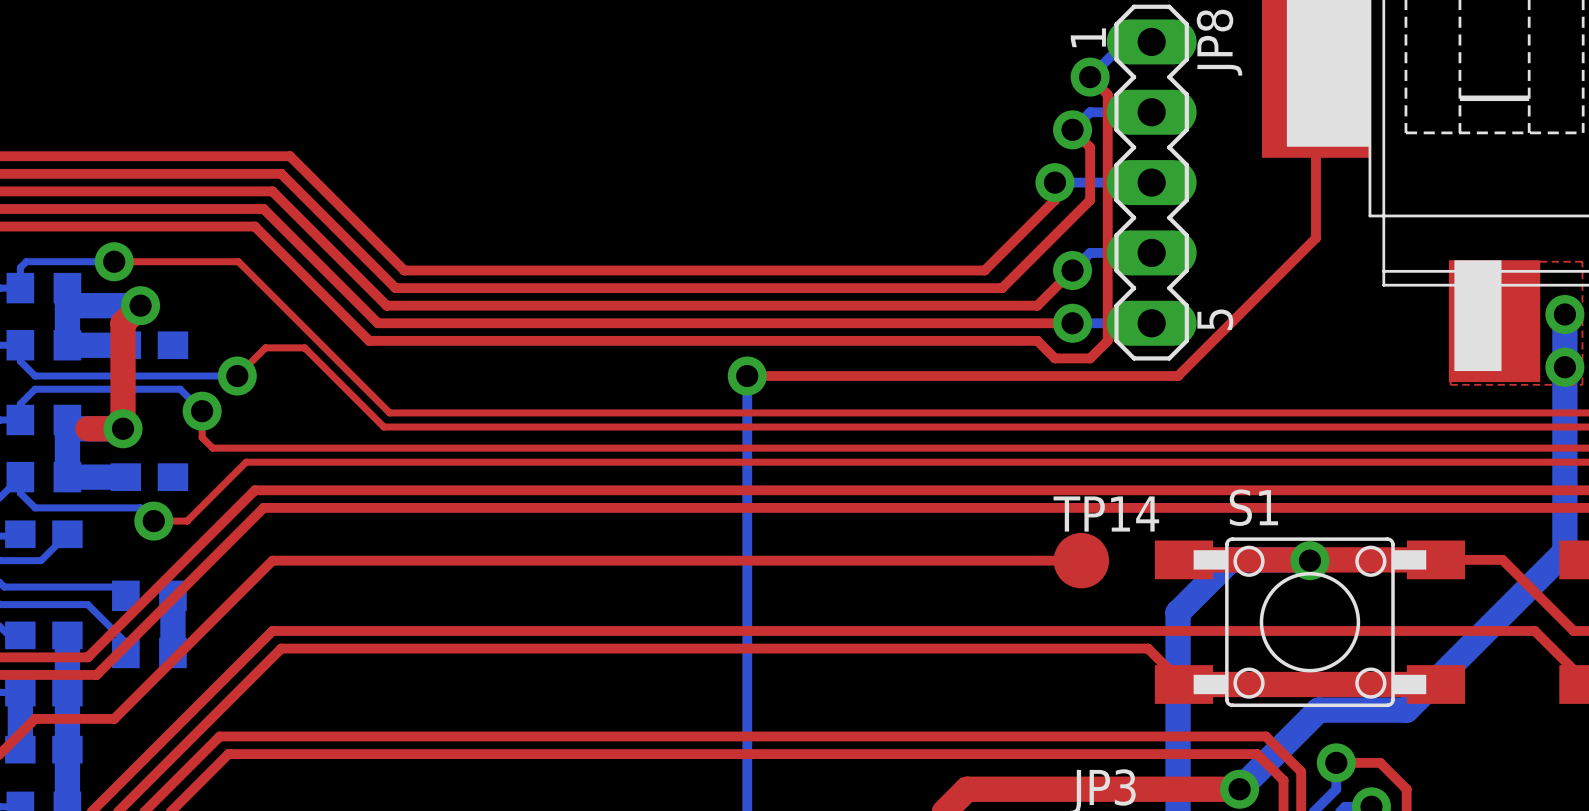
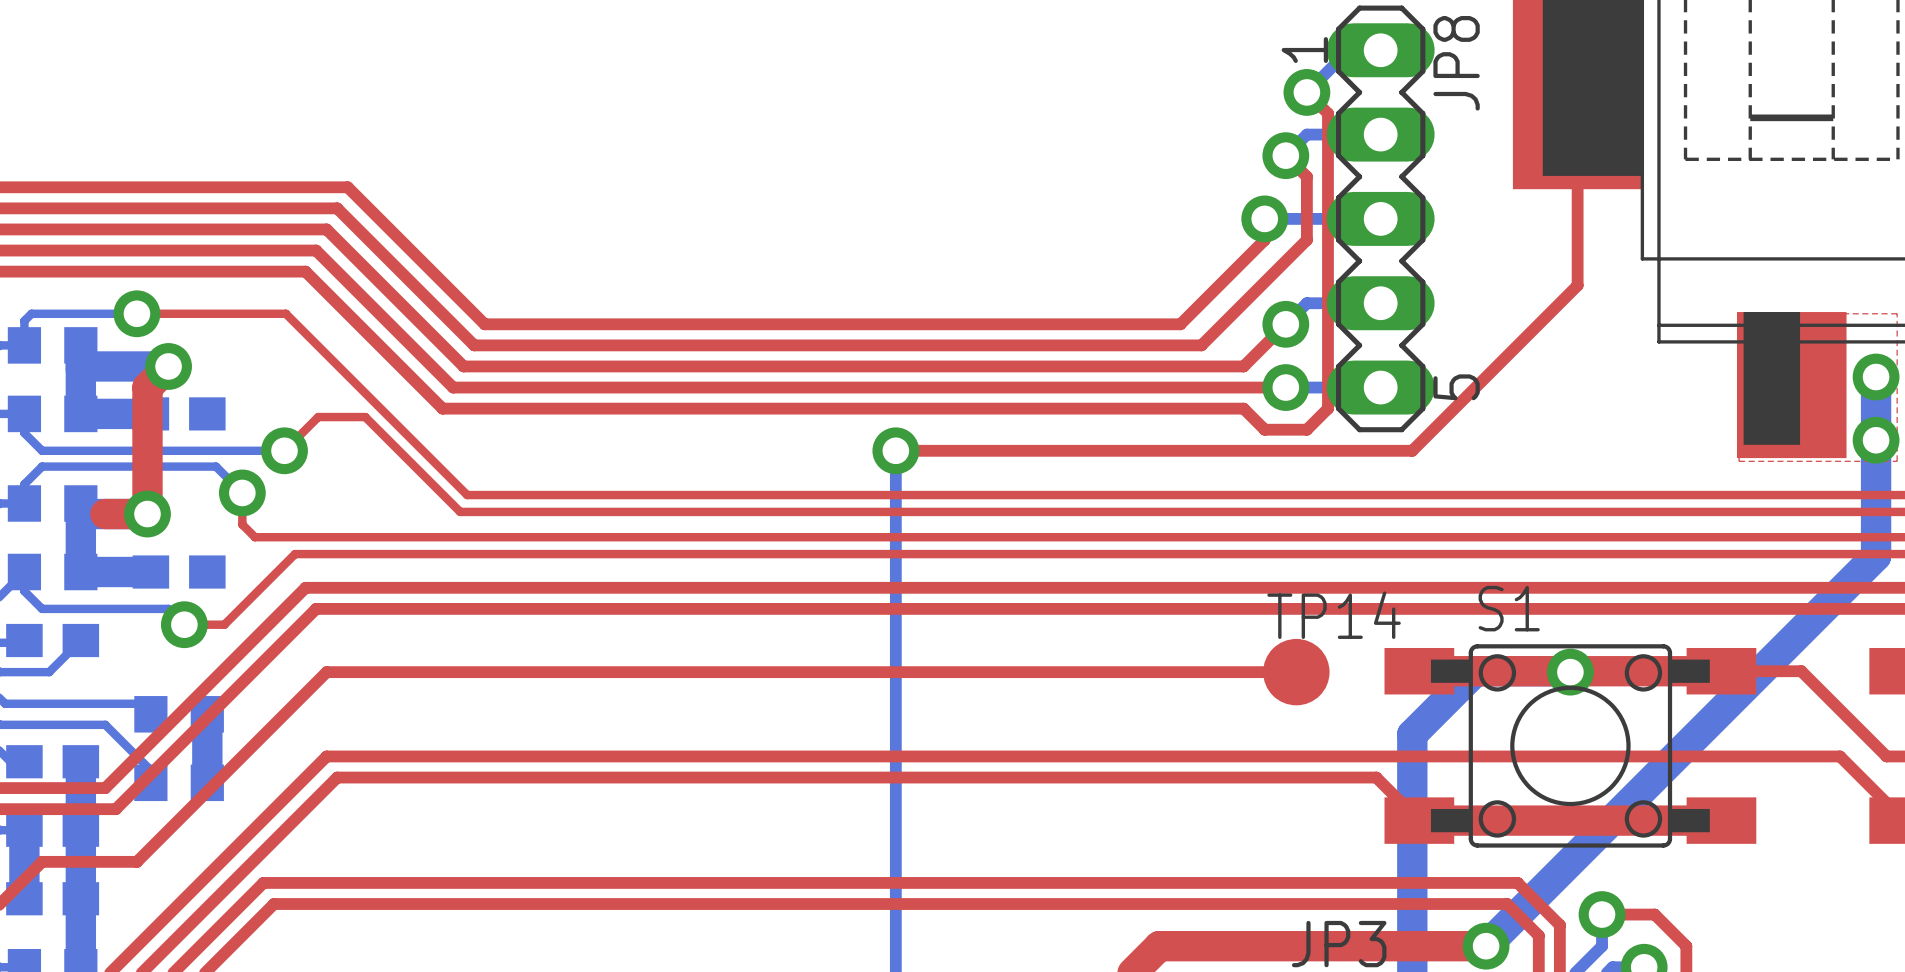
bottom track: (1564, 463) (1564, 551) (1406, 710) (1318, 710) -> (1876, 556) (1580, 851)

